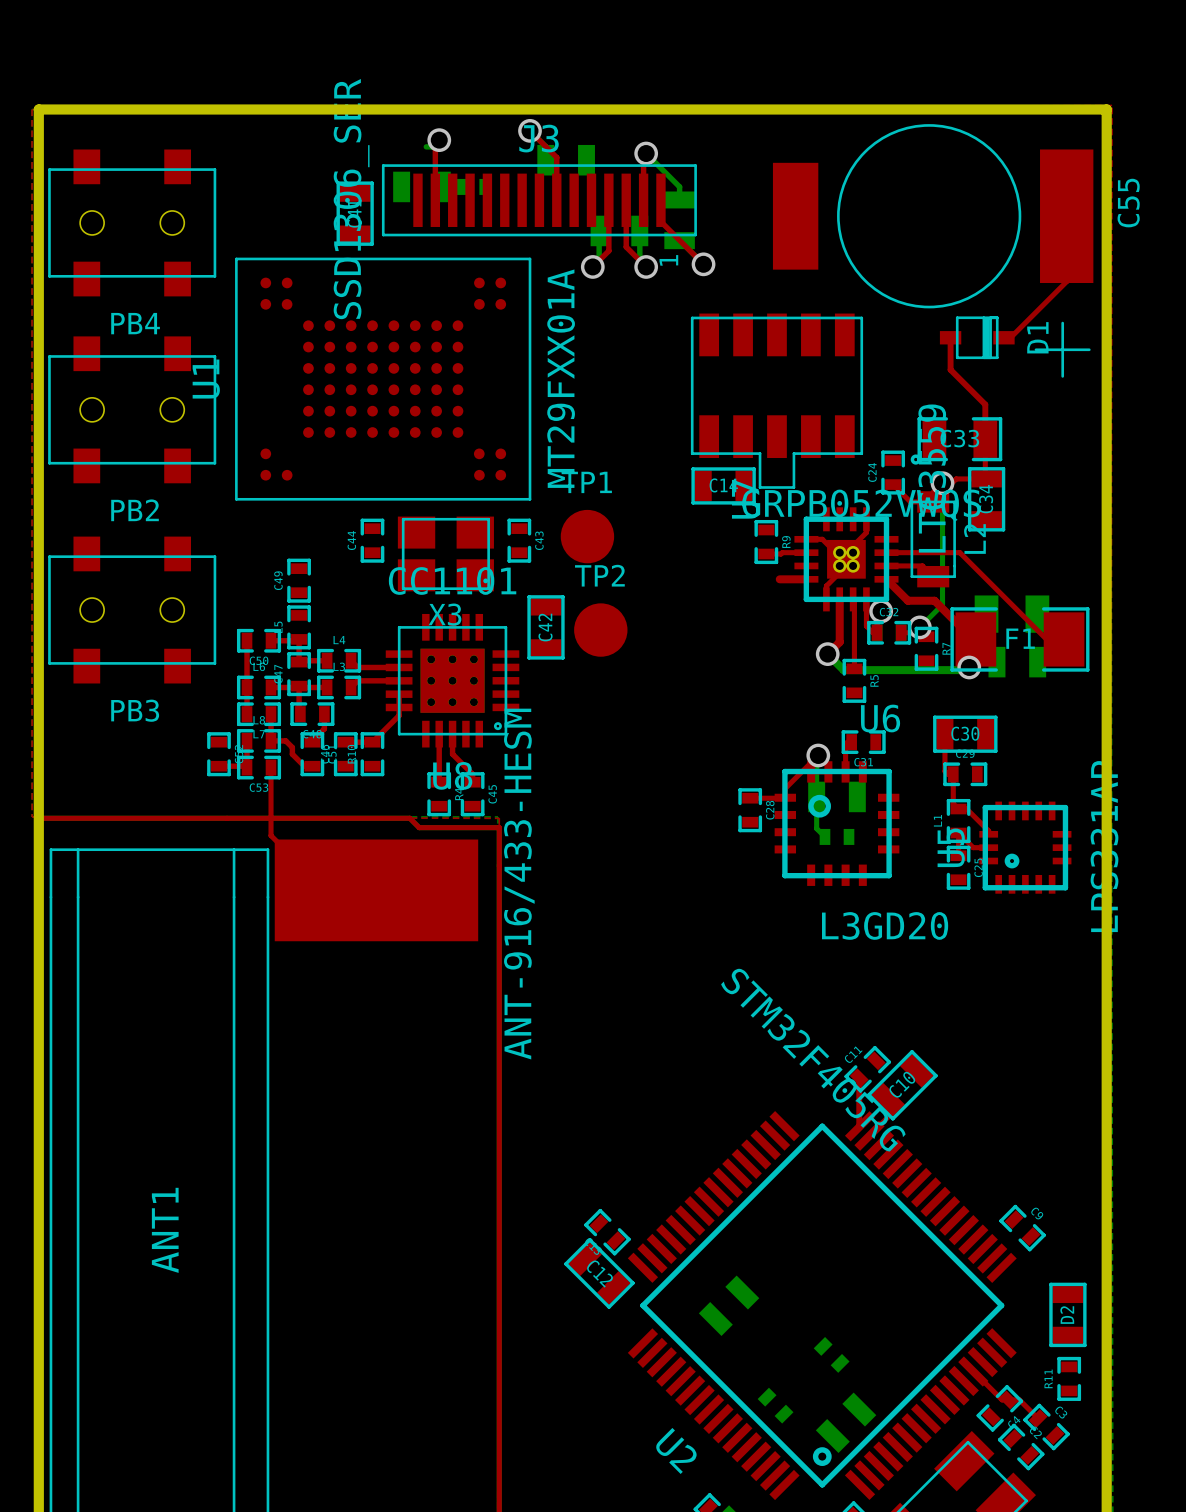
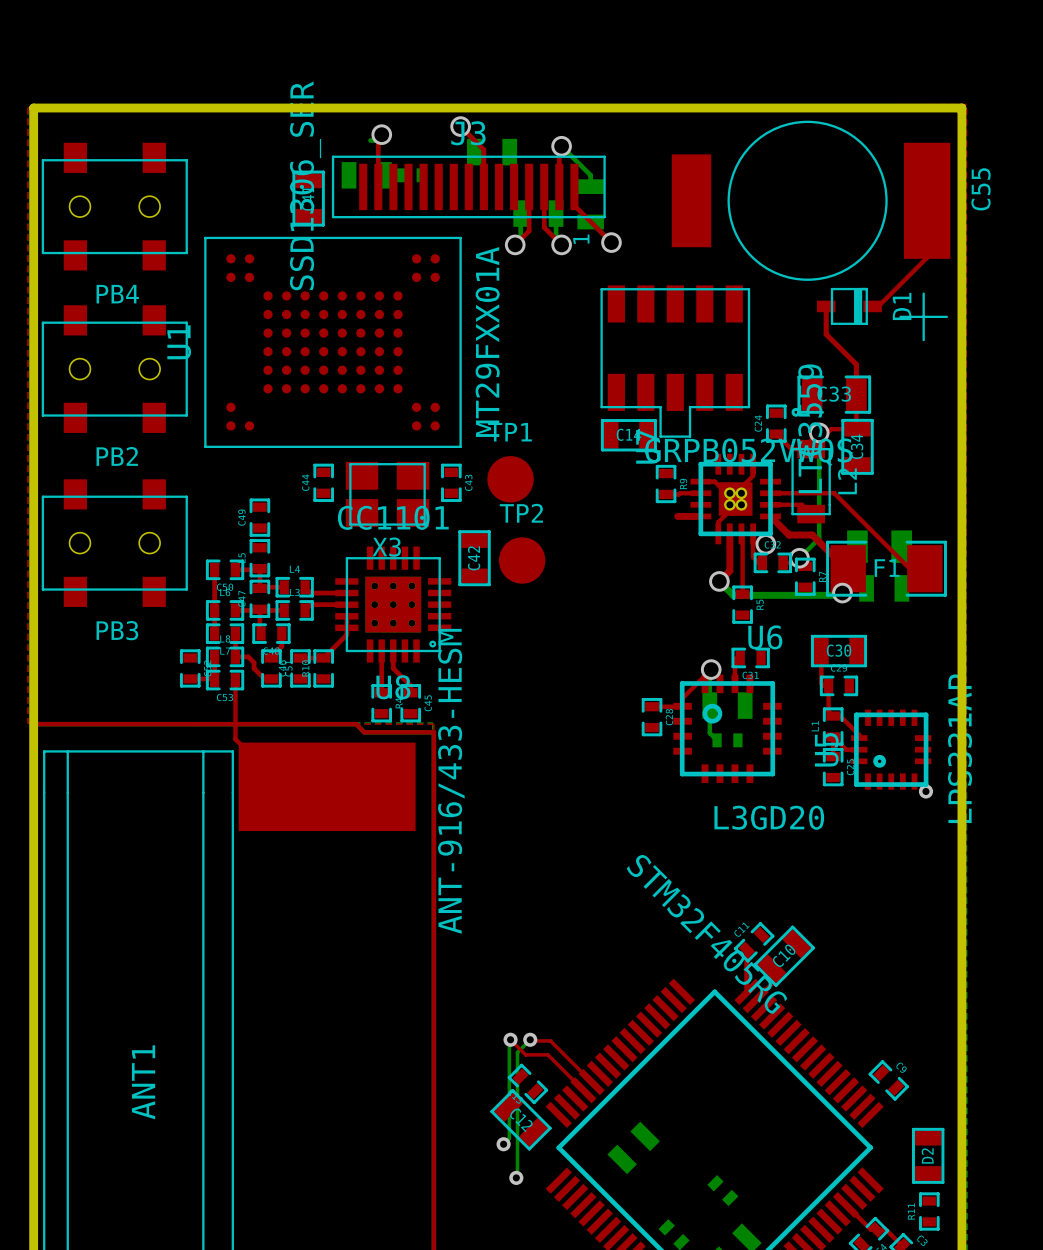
via: none -> (925, 791)
top track: none -> (510, 1039) (525, 1054) (547, 1054) (583, 1090)
bottom track: none -> (510, 1039) (509, 1138) (503, 1144)
via: none -> (510, 1039)
top track: none -> (530, 1039) (550, 1040) (591, 1082)
bottom track: none -> (530, 1039) (517, 1052) (516, 1177)
via: none -> (530, 1039)
via: none -> (503, 1144)
via: none -> (516, 1177)

